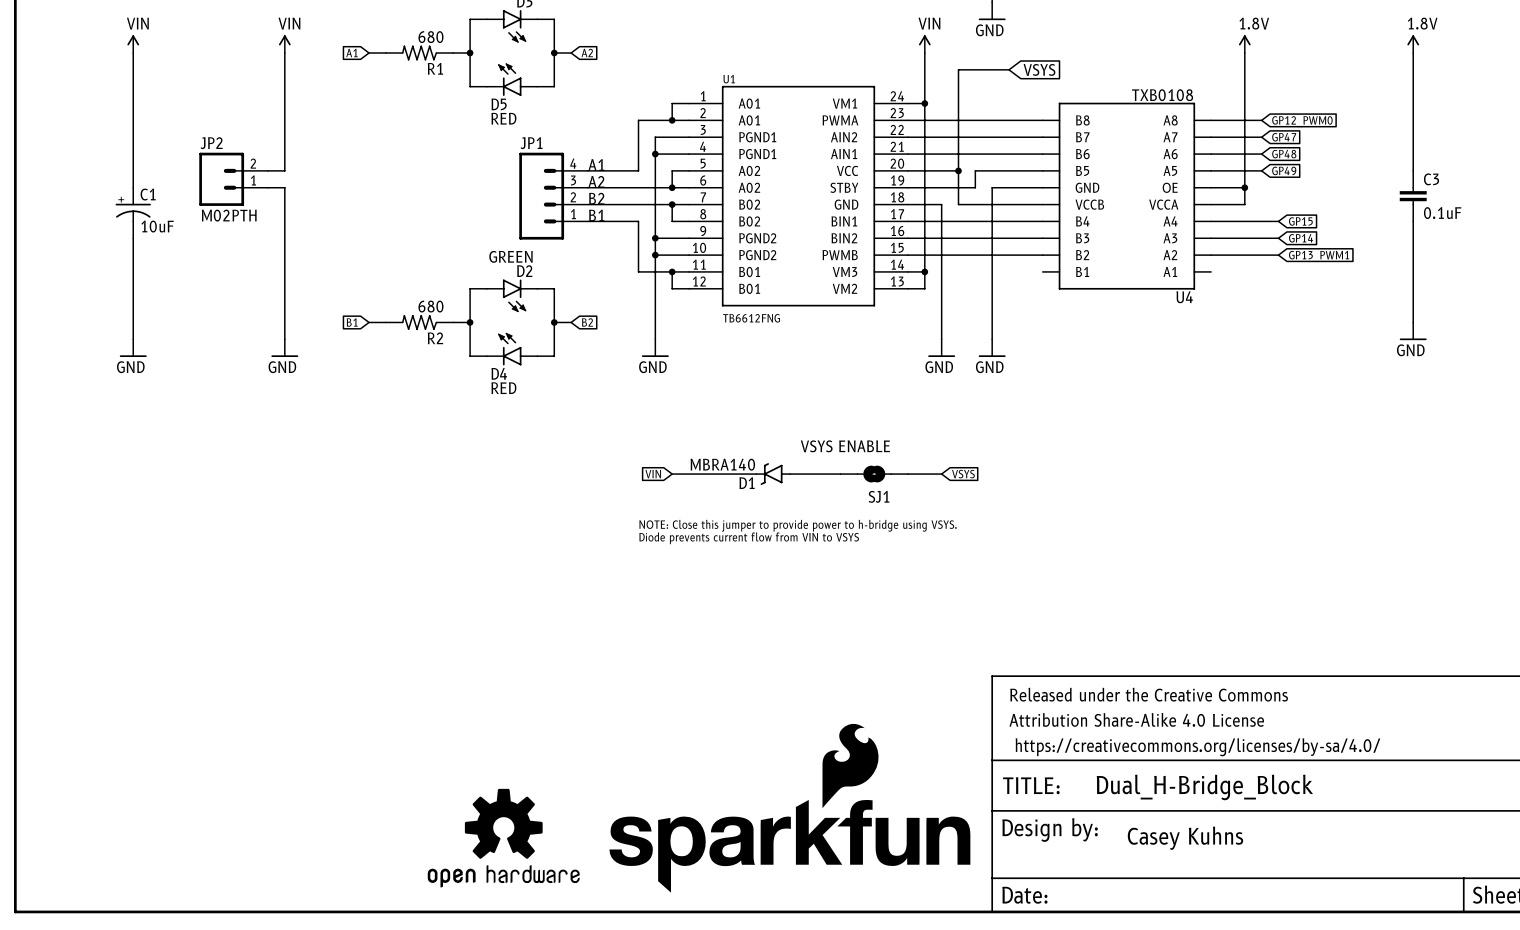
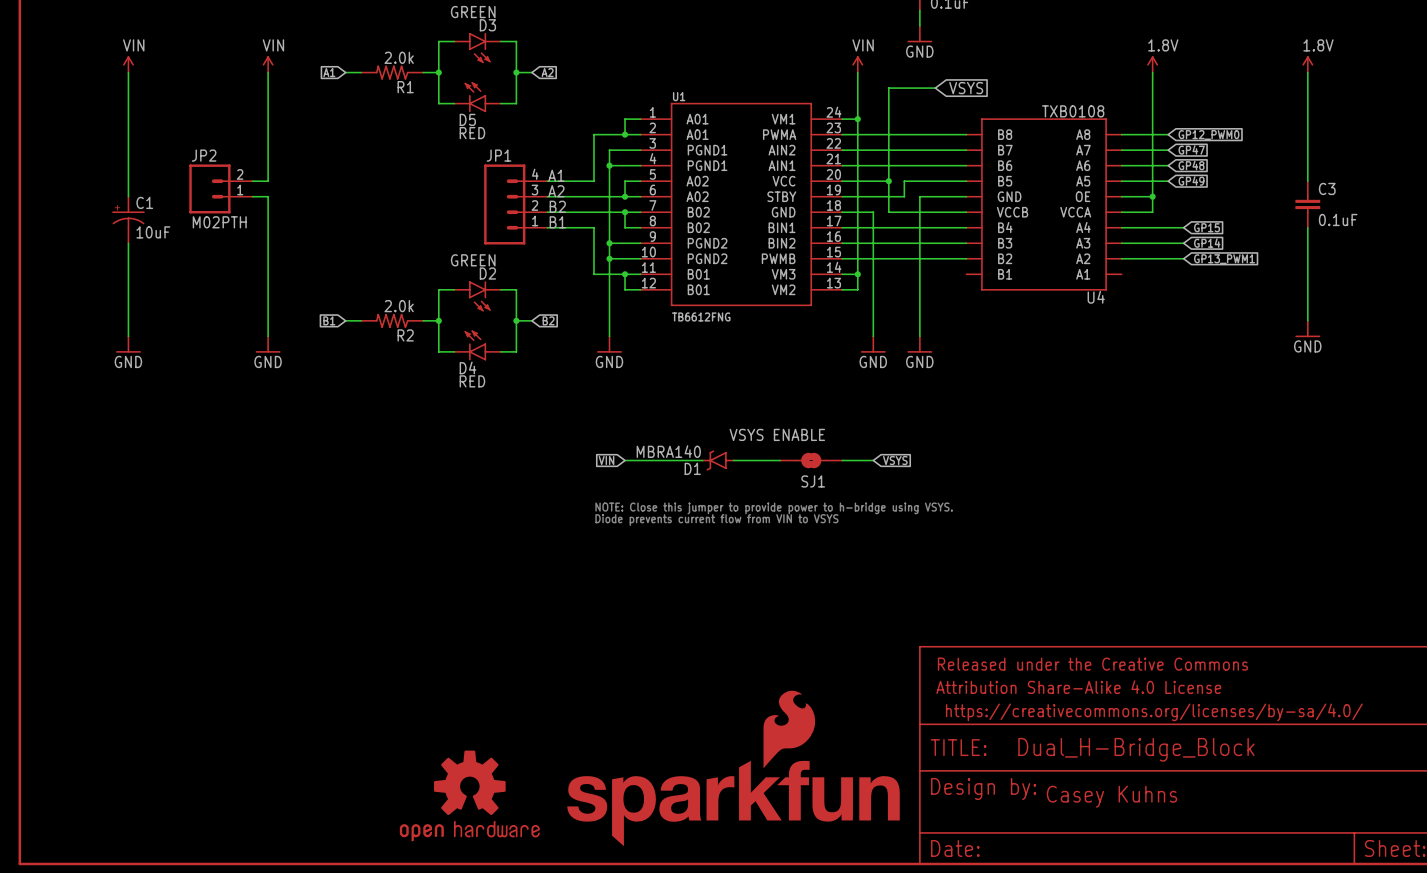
R1 value: 680 (430, 37) -> 2.0k (399, 57)
R2 value: 680 (430, 306) -> 2.0k (399, 306)

